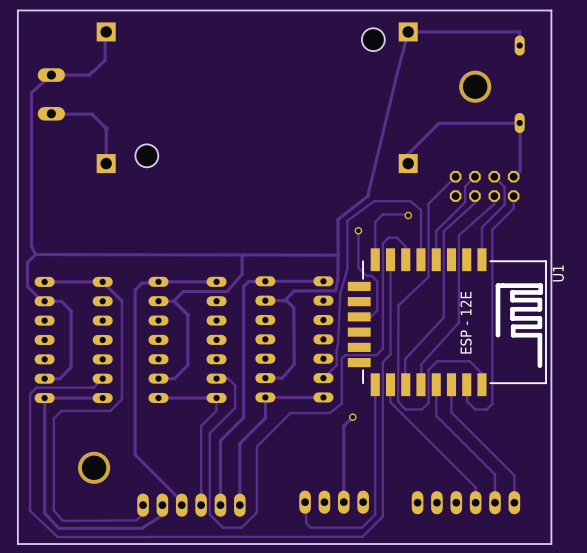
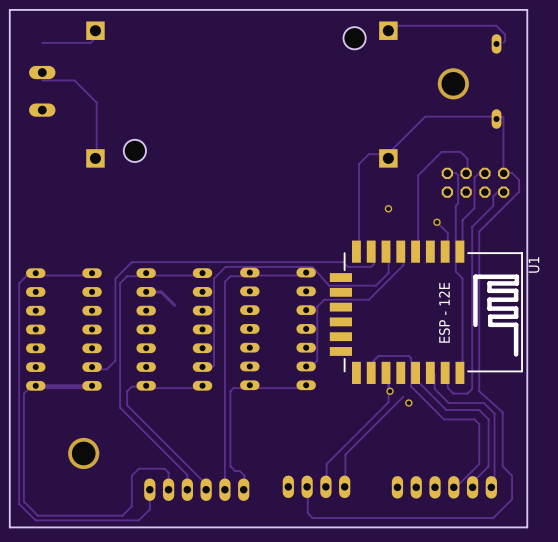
track: none -> (96, 25) (96, 36) (90, 42) (42, 42)
track: none -> (389, 25) (496, 25) (505, 34) (503, 42)
track: (106, 31) (105, 60) (93, 71) (89, 75) (51, 75) (31, 92) (31, 246) (35, 254) -> none
track: (519, 45) (519, 31) (408, 31) (368, 196) (337, 219) (338, 255) -> none
track: none -> (42, 80) (74, 80) (96, 102) (96, 153)
track: (51, 113) (91, 114) (107, 128) (106, 163) -> none
track: (408, 163) (408, 153) (438, 123) (519, 122) (520, 171) (513, 176) -> none
track: (455, 176) (428, 203) (428, 276) (398, 305) (398, 401) (405, 409) (421, 409) (428, 402) (428, 369) (437, 361) (469, 361) (482, 373) (481, 384) -> none
track: (474, 176) (465, 186) (465, 202) (436, 231) (436, 259) -> none
track: (494, 176) (504, 186) (504, 204) (481, 227) (481, 259) -> none
track: none -> (447, 173) (455, 172) (458, 175) (458, 203) (455, 205) (455, 271) (462, 278) (462, 373)
track: none -> (466, 173) (467, 158) (460, 151) (441, 151) (418, 175) (418, 251)
track: none -> (484, 173) (479, 172) (474, 177) (474, 208) (462, 220) (462, 251)
part position: (484, 186) -> (475, 182)
track: (474, 196) (474, 203) (443, 231) (443, 317) (405, 359) (405, 384) -> none
track: (494, 196) (494, 204) (458, 235) (458, 322) (421, 364) (420, 384) -> none
track: (513, 196) (513, 208) (492, 229) (492, 403) (486, 409) (475, 409) (467, 401) (466, 384) -> none
track: none -> (503, 192) (498, 191) (493, 196) (493, 205) (472, 226) (472, 388) (467, 393) (453, 393) (447, 387) (447, 373)
track: (408, 215) (382, 214) (375, 221) (375, 259) -> none
track: none -> (436, 222) (447, 233) (447, 251)
via: none -> (436, 222)
track: (358, 230) (358, 267) (366, 275) (371, 275) (377, 281) (377, 310) (370, 316) (359, 316) -> none
via: (358, 230) -> none
track: (35, 254) (27, 262) (27, 286) (42, 301) (44, 301) -> none
track: (35, 254) (243, 254) -> none
track: (243, 254) (338, 255) -> none
track: (243, 254) (242, 274) (227, 291) (183, 291) (173, 300) (187, 314) (187, 365) (174, 378) (158, 378) -> none
track: (338, 255) (335, 290) (294, 290) (284, 300) -> none
track: none -> (359, 251) (359, 164) (368, 154) (388, 154) (425, 116) (503, 117) (503, 173) (512, 172) (519, 180) (519, 191) (479, 231) (479, 391) (502, 412) (502, 466) (512, 475) (512, 499) (493, 518) (312, 518) (307, 513) (307, 490)
track: (390, 259) (390, 354) (382, 362) (382, 516) (362, 536) (57, 537) (30, 510) (30, 394) (36, 387) (93, 387) (102, 378) -> none
track: none -> (373, 251) (373, 264) (371, 266) (347, 266) (343, 262) (131, 262) (115, 278) (115, 360) (106, 369) (93, 369)
track: (405, 259) (405, 246) (396, 237) (388, 237) (382, 243) (382, 348) (376, 355) (345, 355) (341, 358) (341, 403) (329, 413) (290, 413) (256, 446) (256, 512) (241, 527) (222, 527) (209, 514) (209, 433) (235, 407) (235, 385) (228, 378) (216, 378) -> none
track: none -> (388, 251) (388, 273) (375, 285) (329, 285) (312, 266) (225, 266) (213, 278) (213, 365) (209, 370) (196, 369)
track: (420, 259) (420, 209) (410, 201) (374, 201) (347, 220) (347, 269) (340, 293) (336, 365) (323, 378) -> none
track: none -> (403, 251) (403, 265) (368, 299) (324, 299) (317, 306) (317, 360) (310, 367) (298, 369)
track: (44, 281) (102, 281) (121, 301) (121, 399) (110, 410) (61, 410) (53, 418) (53, 510) (62, 520) (136, 520) (142, 515) (143, 505) -> none
track: (216, 281) (142, 283) (135, 290) (135, 454) (181, 501) (181, 505) -> (93, 388) (30, 386) (23, 393) (23, 501) (37, 515) (122, 515) (131, 506) (131, 475) (138, 468) (164, 468) (168, 472) (168, 489)
track: (323, 281) (248, 281) (243, 286) (243, 417) (220, 440) (220, 505) -> (196, 388) (131, 386) (127, 391) (127, 405) (206, 484) (206, 489)
track: (265, 300) (286, 300) (293, 307) (294, 364) (282, 378) (265, 378) -> none
track: (44, 301) (61, 301) (71, 310) (71, 367) (59, 378) (44, 378) -> none
track: (375, 384) (375, 514) (362, 527) (310, 527) (306, 523) (305, 502) -> none
track: (390, 384) (390, 402) (475, 487) (475, 502) -> none
track: none -> (373, 373) (373, 360) (378, 356) (408, 356) (411, 358) (411, 386) (444, 419) (474, 419) (479, 424) (479, 464) (456, 486) (456, 490)
track: none -> (388, 373) (388, 402) (326, 464) (326, 490)
track: (436, 384) (436, 415) (495, 474) (495, 502) -> none
track: none -> (418, 373) (418, 381) (446, 410) (479, 410) (488, 419) (488, 466) (476, 478) (475, 490)
track: (451, 384) (451, 412) (514, 475) (514, 502) -> none
track: none -> (432, 373) (434, 388) (448, 403) (483, 403) (494, 413) (494, 490)
track: (158, 397) (216, 397) (216, 410) (201, 426) (201, 505) -> (196, 275) (127, 276) (120, 283) (120, 407) (187, 474) (187, 489)
track: (265, 397) (265, 418) (239, 443) (239, 505) -> (298, 275) (230, 276) (224, 281) (224, 489)
track: (265, 397) (323, 397) -> none
track: (48, 398) (44, 401) (44, 513) (58, 528) (141, 528) (162, 515) (162, 505) -> (93, 275) (26, 276) (19, 283) (19, 503) (35, 520) (138, 520) (149, 509) (149, 489)
track: none -> (298, 388) (233, 388) (230, 391) (230, 466) (244, 475) (243, 489)
via: none -> (390, 391)
track: none -> (403, 396) (345, 454) (345, 490)
via: none -> (408, 403)
track: (352, 417) (343, 426) (343, 502) -> none
via: (352, 417) -> none
part position: (191, 505) -> (196, 489)

